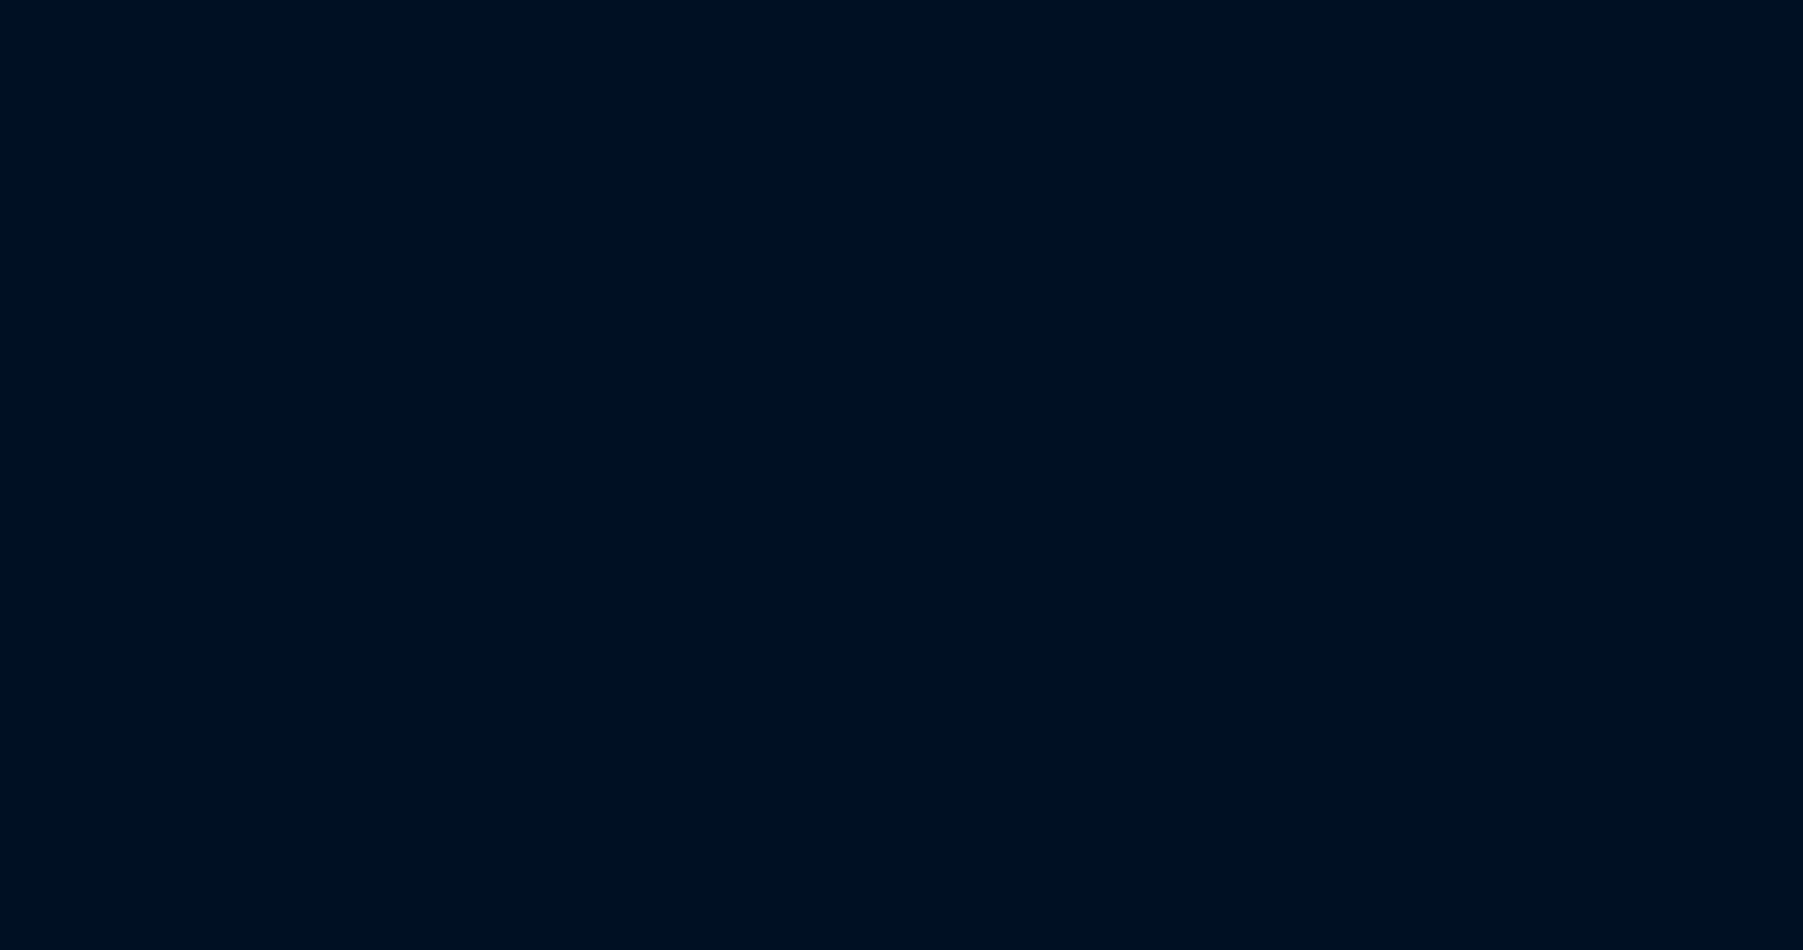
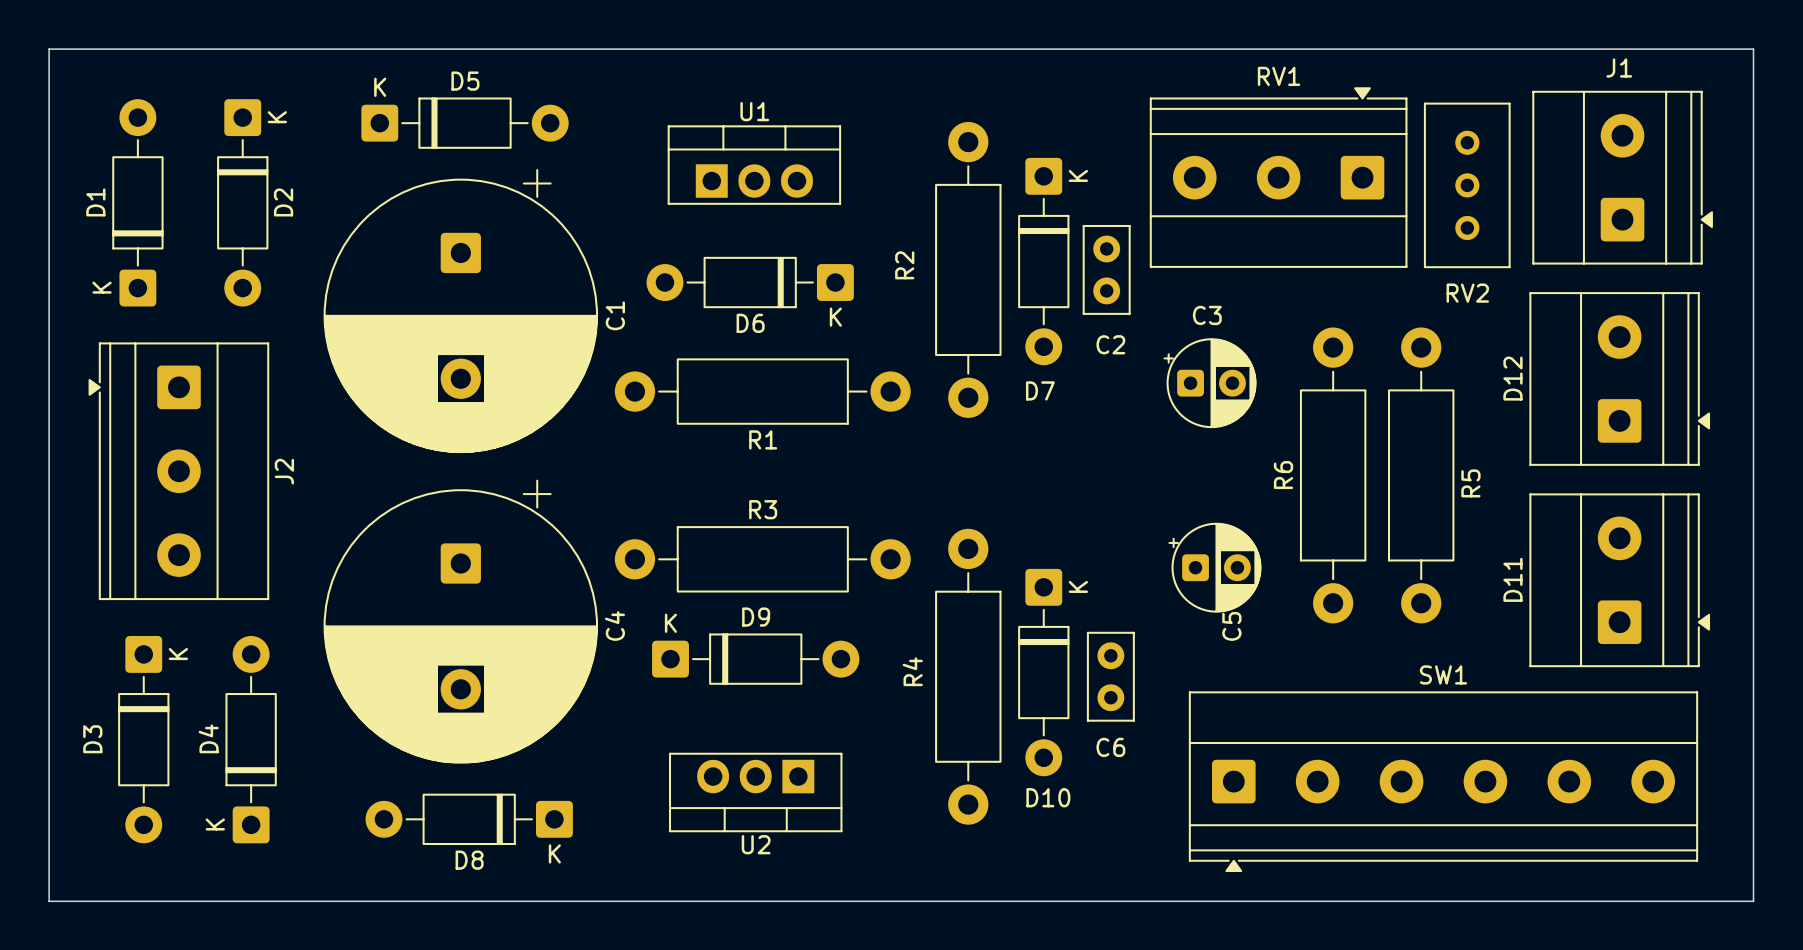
board edge: none -> (49, 49) (1753, 49) (1753, 901) (49, 901) (49, 49)
D5: none -> (465, 123)
U1: none -> (754, 165)
RV1: none -> (1278, 177)
J1: none -> (1622, 177)
RV2: none -> (1467, 185)
D1: none -> (137, 202)
D2: none -> (242, 202)
D7: none -> (1043, 261)
R2: none -> (968, 269)
C2: none -> (1106, 269)
D6: none -> (750, 282)
C1: none -> (460, 311)
D12: none -> (1619, 378)
C3: none -> (1209, 383)
R1: none -> (762, 391)
J2: none -> (178, 471)
R6: none -> (1333, 475)
R5: none -> (1421, 475)
R3: none -> (762, 559)
C5: none -> (1214, 567)
D11: none -> (1619, 580)
C4: none -> (460, 621)
D9: none -> (755, 659)
D10: none -> (1043, 672)
R4: none -> (968, 676)
C6: none -> (1110, 676)
D3: none -> (143, 739)
D4: none -> (251, 739)
SW1: none -> (1443, 781)
U2: none -> (755, 792)
D8: none -> (469, 819)

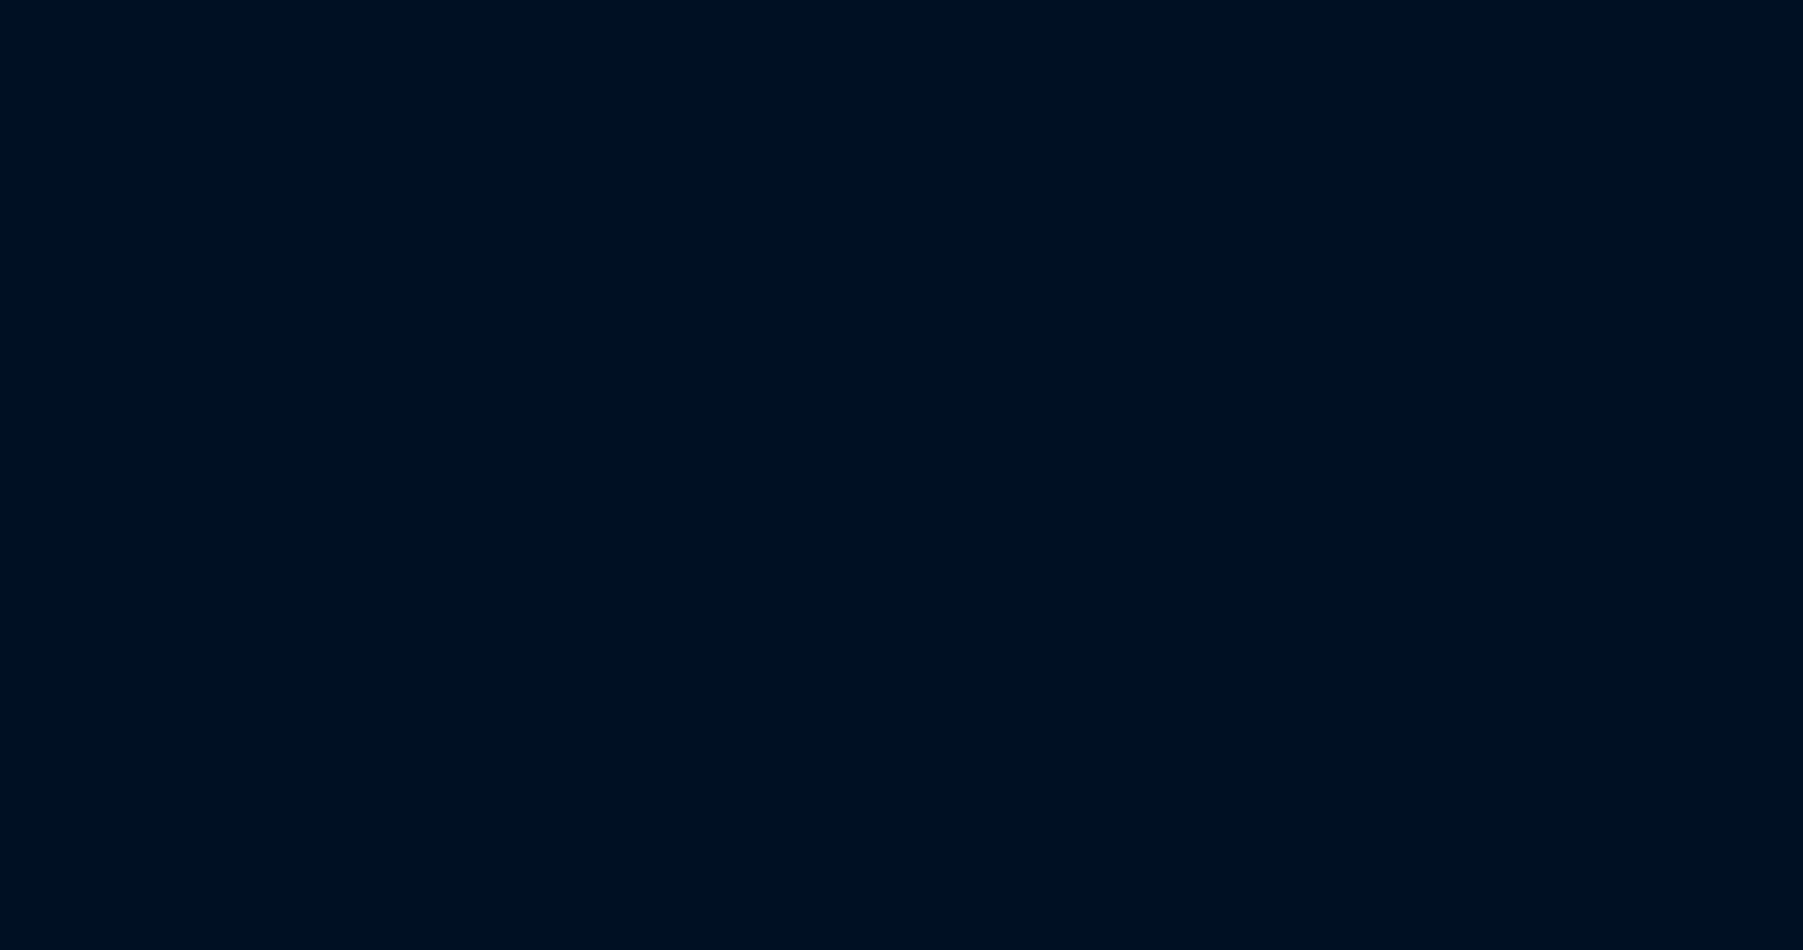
board edge: (49, 49) (1753, 49) (1753, 901) (49, 901) (49, 49) -> none
D5: (465, 123) -> none
U1: (754, 165) -> none
RV1: (1278, 177) -> none
J1: (1622, 177) -> none
RV2: (1467, 185) -> none
D1: (137, 202) -> none
D2: (242, 202) -> none
D7: (1043, 261) -> none
R2: (968, 269) -> none
C2: (1106, 269) -> none
D6: (750, 282) -> none
C1: (460, 311) -> none
D12: (1619, 378) -> none
C3: (1209, 383) -> none
R1: (762, 391) -> none
J2: (178, 471) -> none
R6: (1333, 475) -> none
R5: (1421, 475) -> none
R3: (762, 559) -> none
C5: (1214, 567) -> none
D11: (1619, 580) -> none
C4: (460, 621) -> none
D9: (755, 659) -> none
D10: (1043, 672) -> none
R4: (968, 676) -> none
C6: (1110, 676) -> none
D3: (143, 739) -> none
D4: (251, 739) -> none
SW1: (1443, 781) -> none
U2: (755, 792) -> none
D8: (469, 819) -> none

